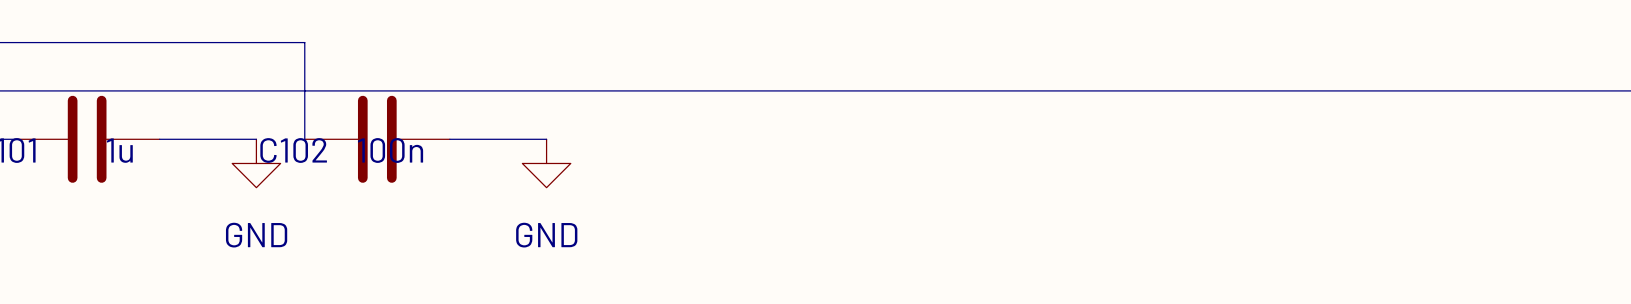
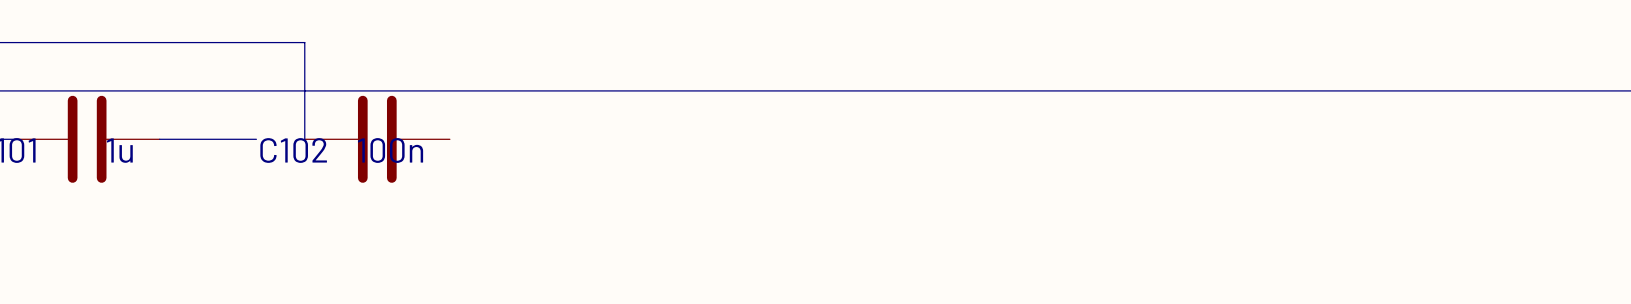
wire: (449, 139) (546, 139) -> none
power symbol: GND (256, 163) -> none
power symbol: GND (546, 163) -> none

